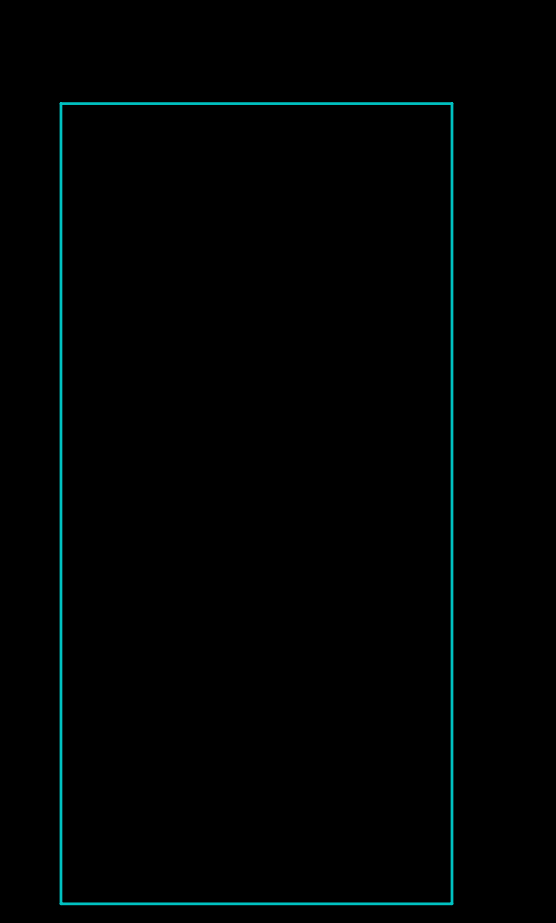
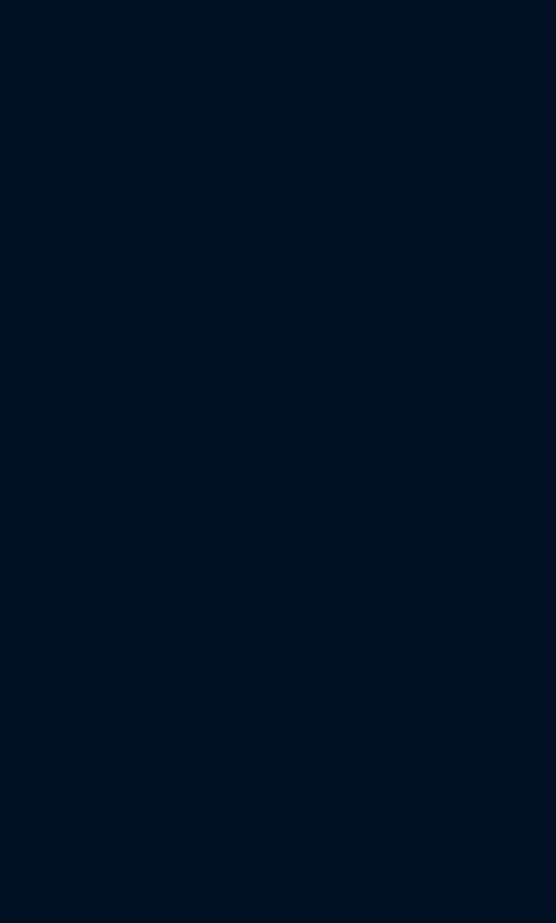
line: (60, 103) (451, 103) (451, 903) (60, 903) (60, 103) -> none

